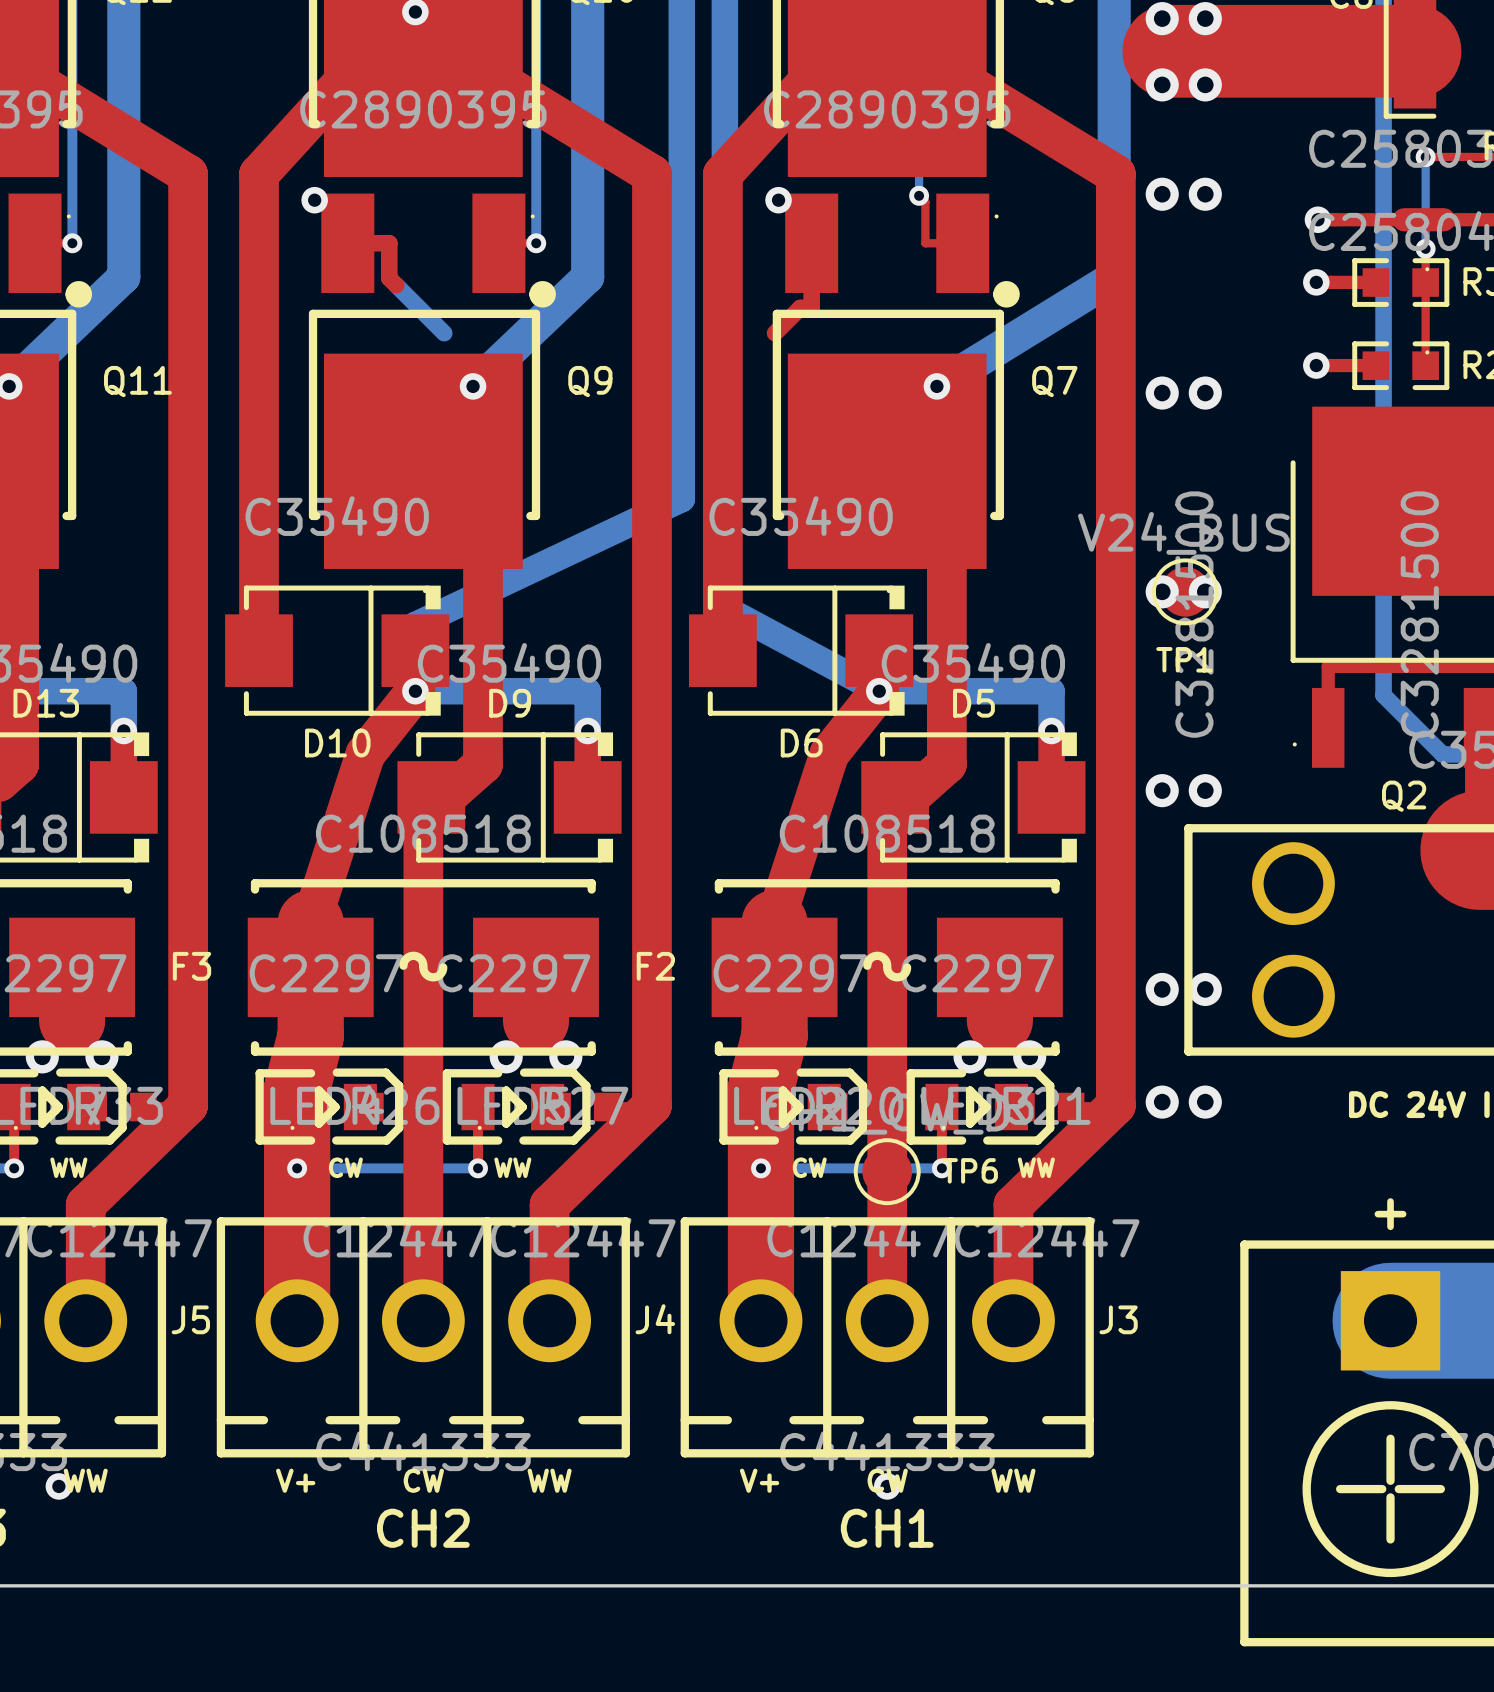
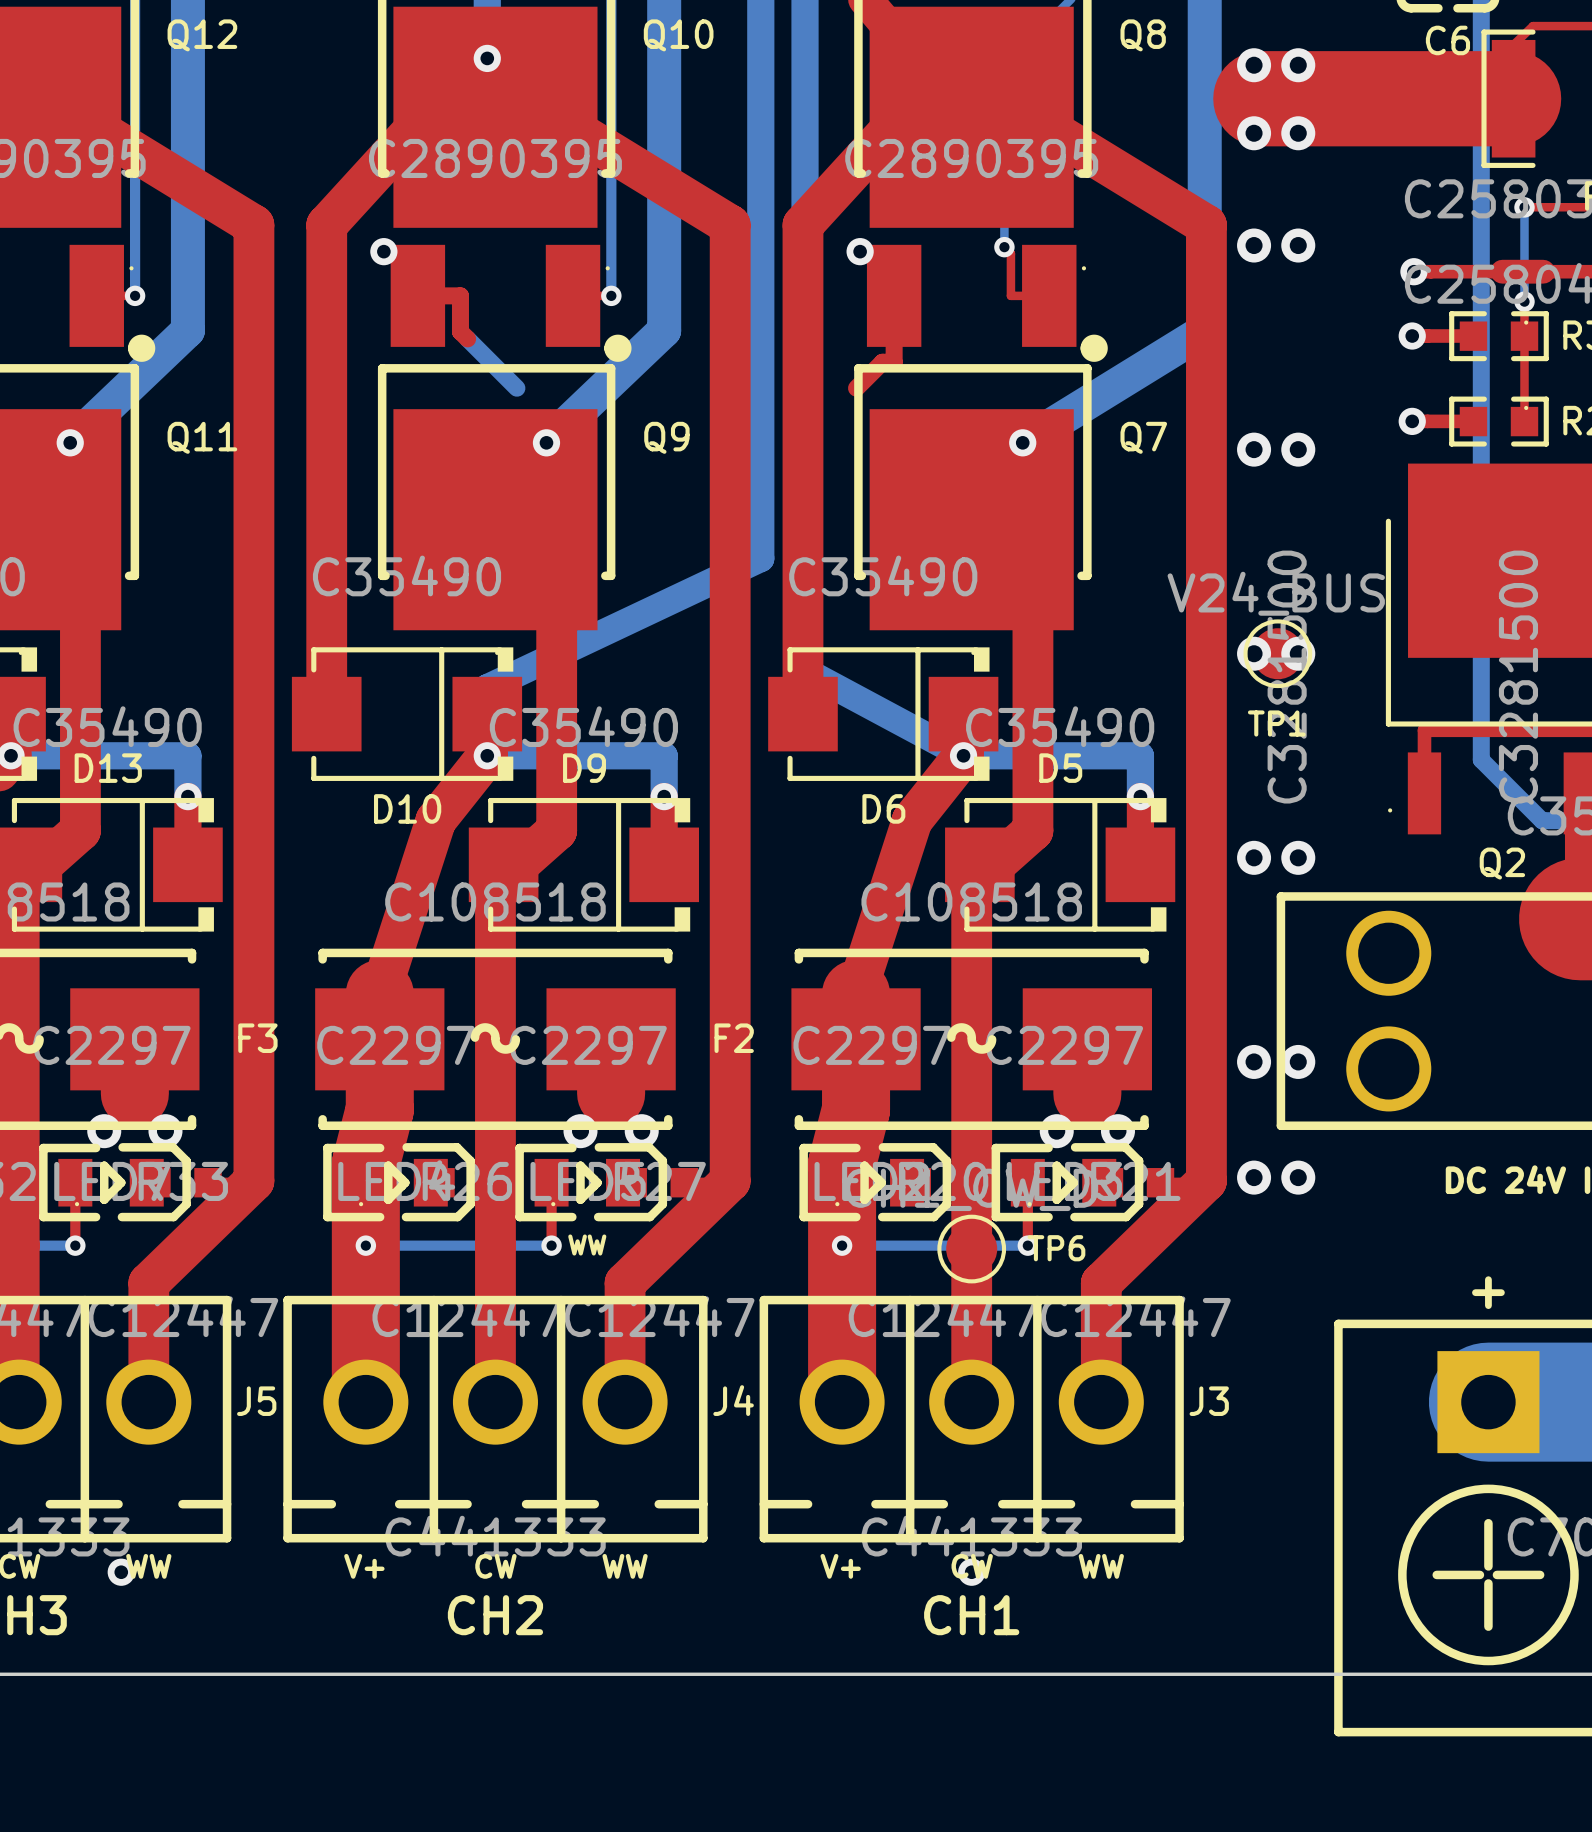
text: WW (68, 1167) -> none
text: CW (345, 1167) -> none
text: CW (809, 1167) -> none
text: WW (1036, 1167) -> none

